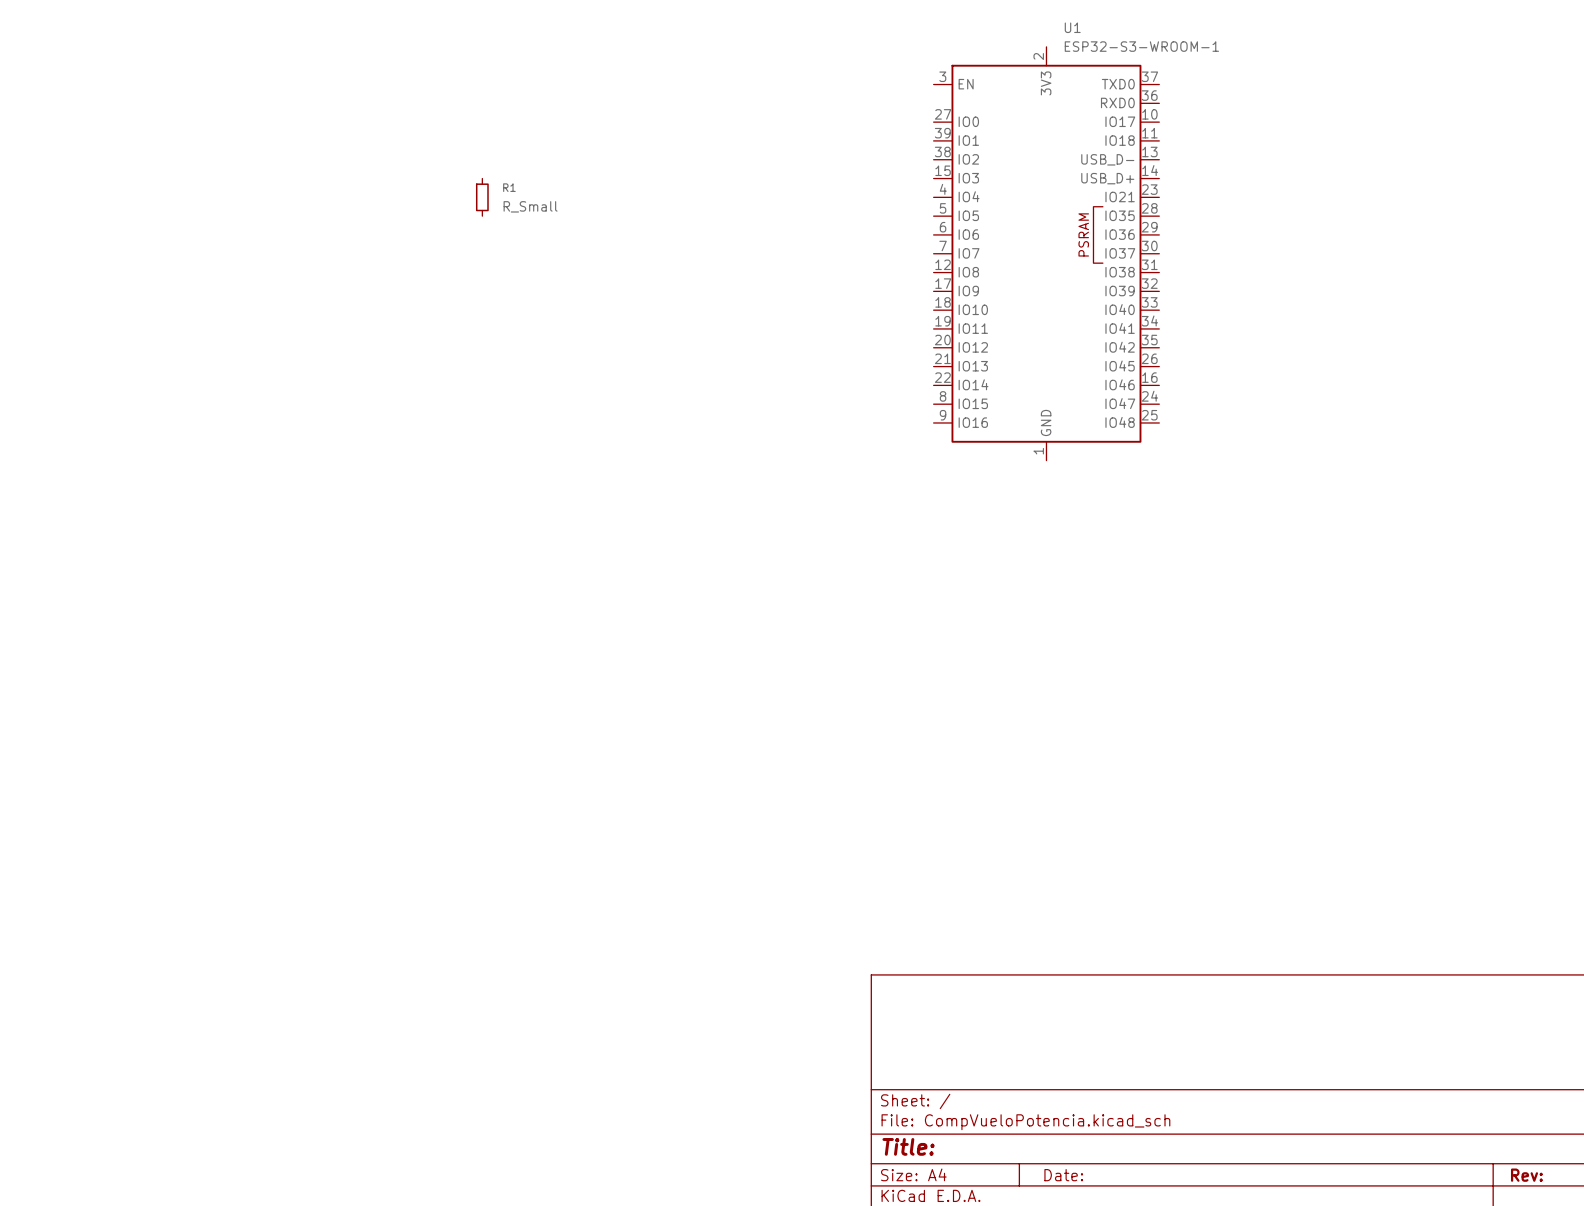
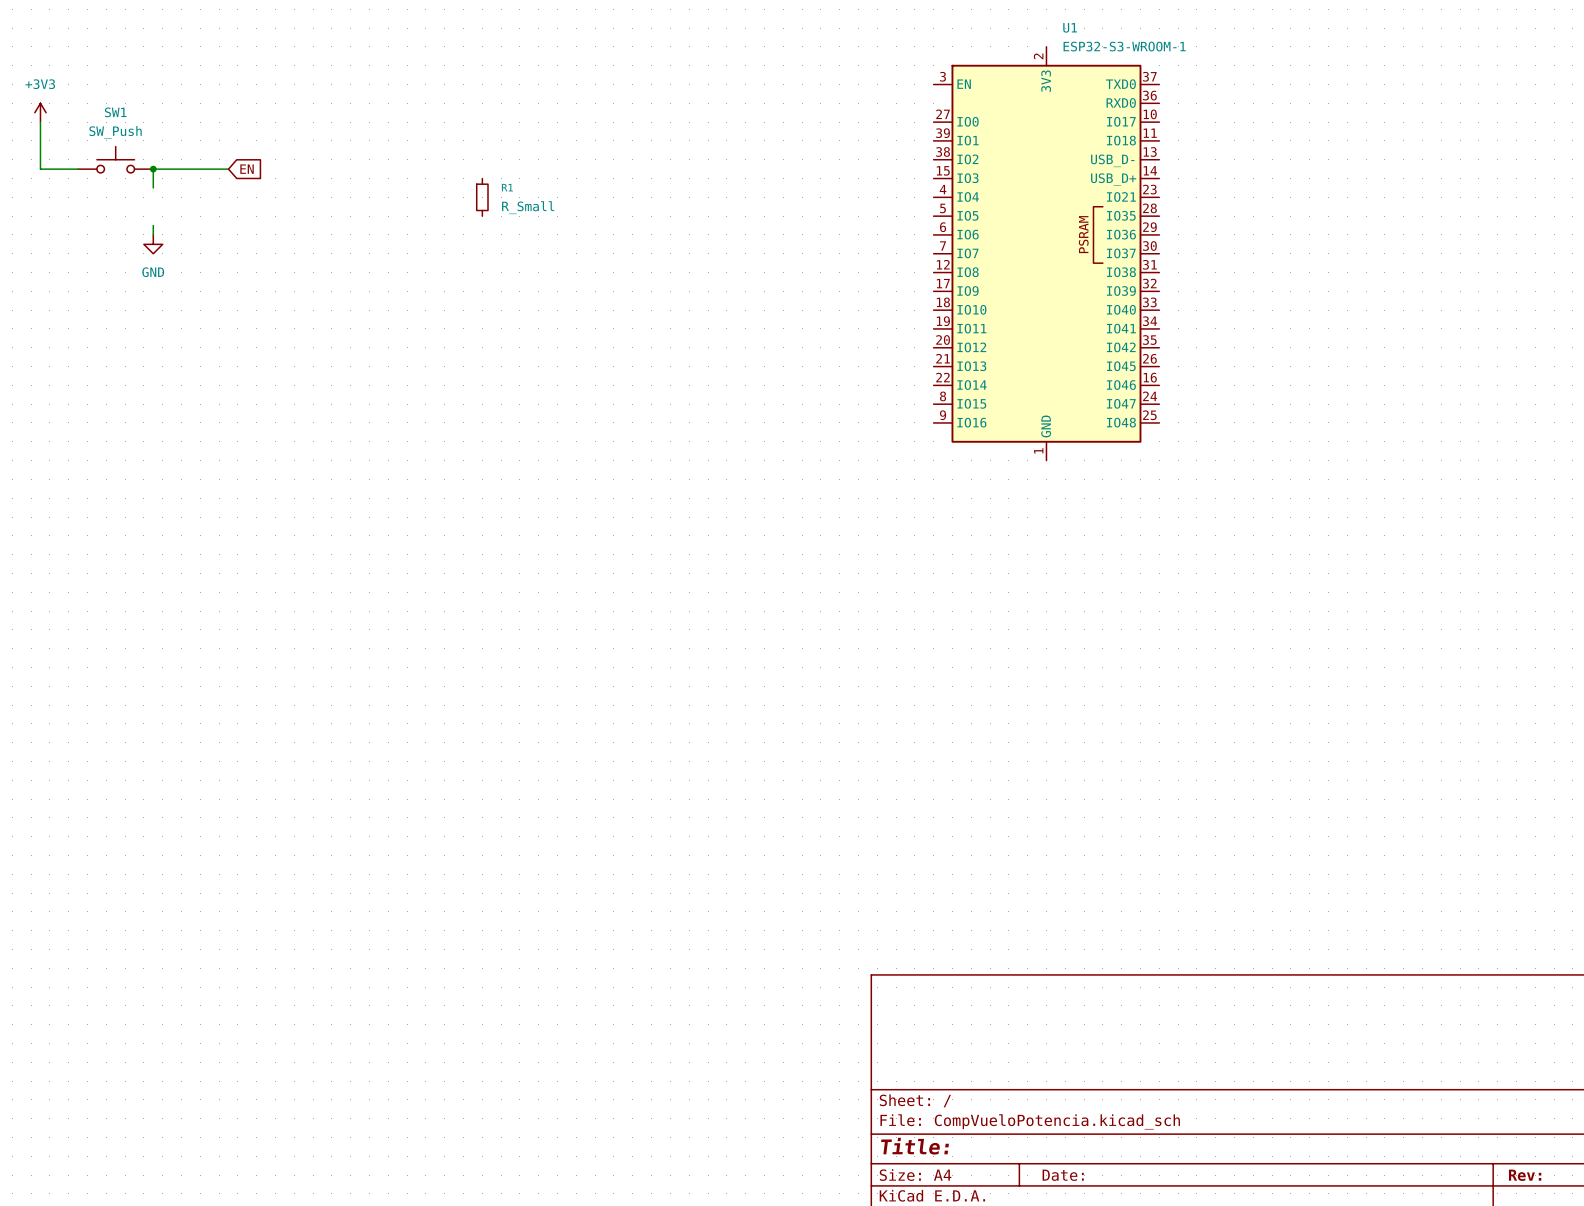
power symbol: none -> +3V3 (40, 112)
wire: none -> (40, 122) (40, 169) (78, 169)
SW1: none -> SW_Push (115, 159)
junction: none -> (153, 169)
wire: none -> (228, 169) (153, 169) (153, 187)
global label: none -> EN (247, 169)
wire: none -> (153, 225) (153, 234)
power symbol: none -> GND (153, 244)

